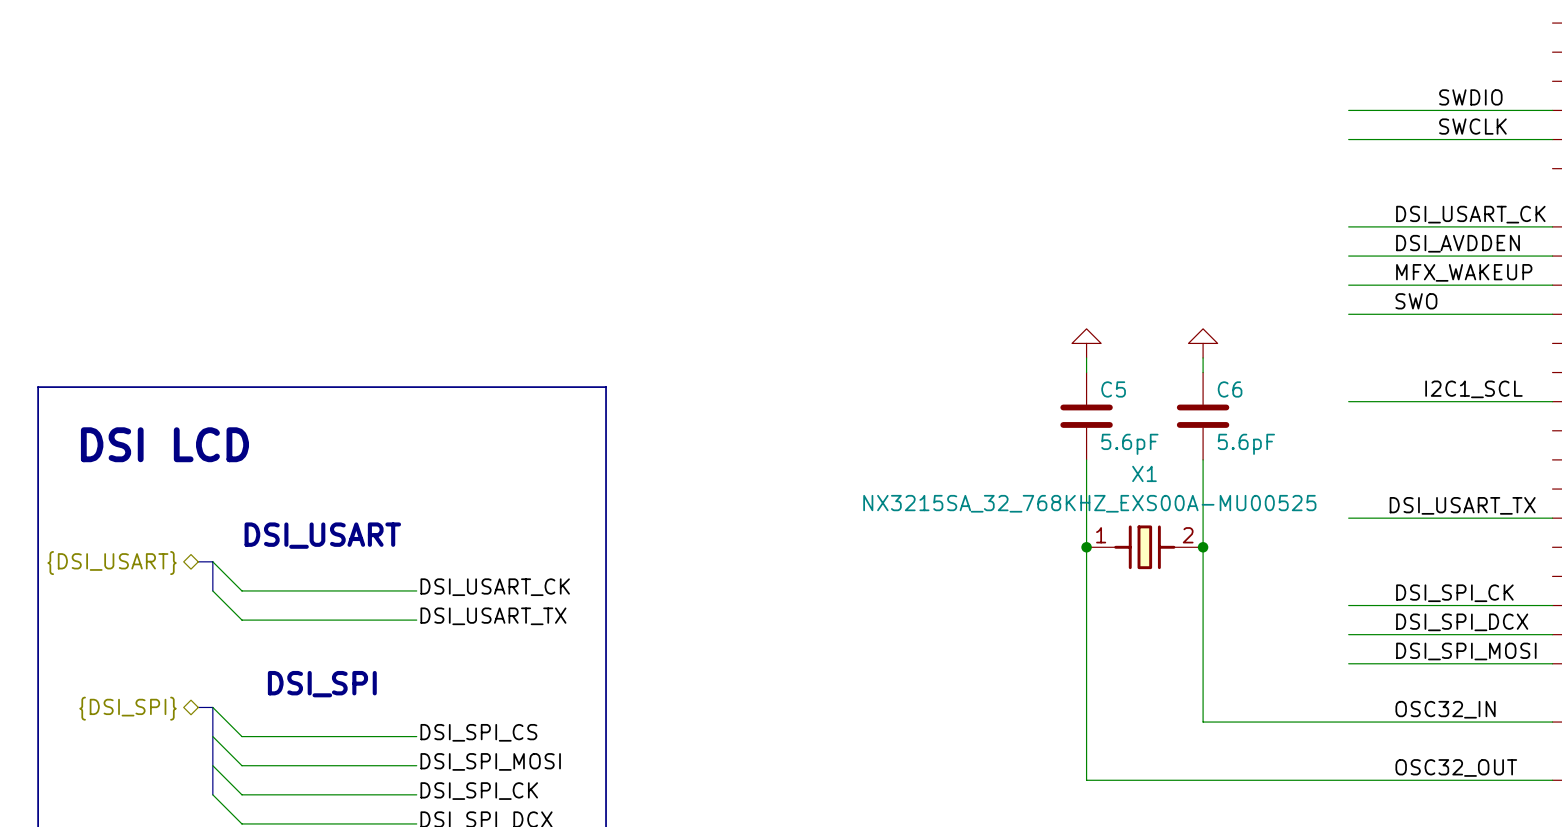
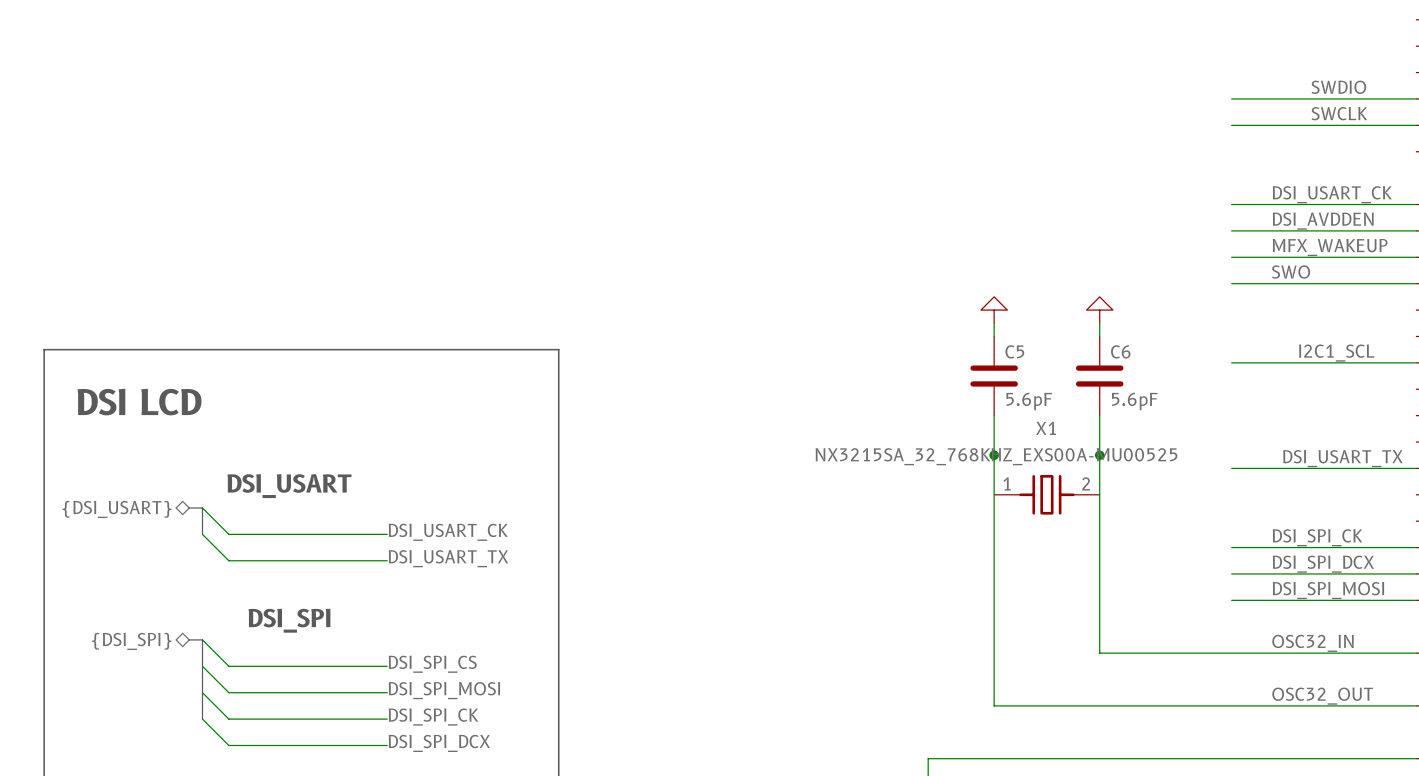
junction position: (1086, 547) -> (994, 455)
junction position: (1203, 547) -> (1099, 455)

